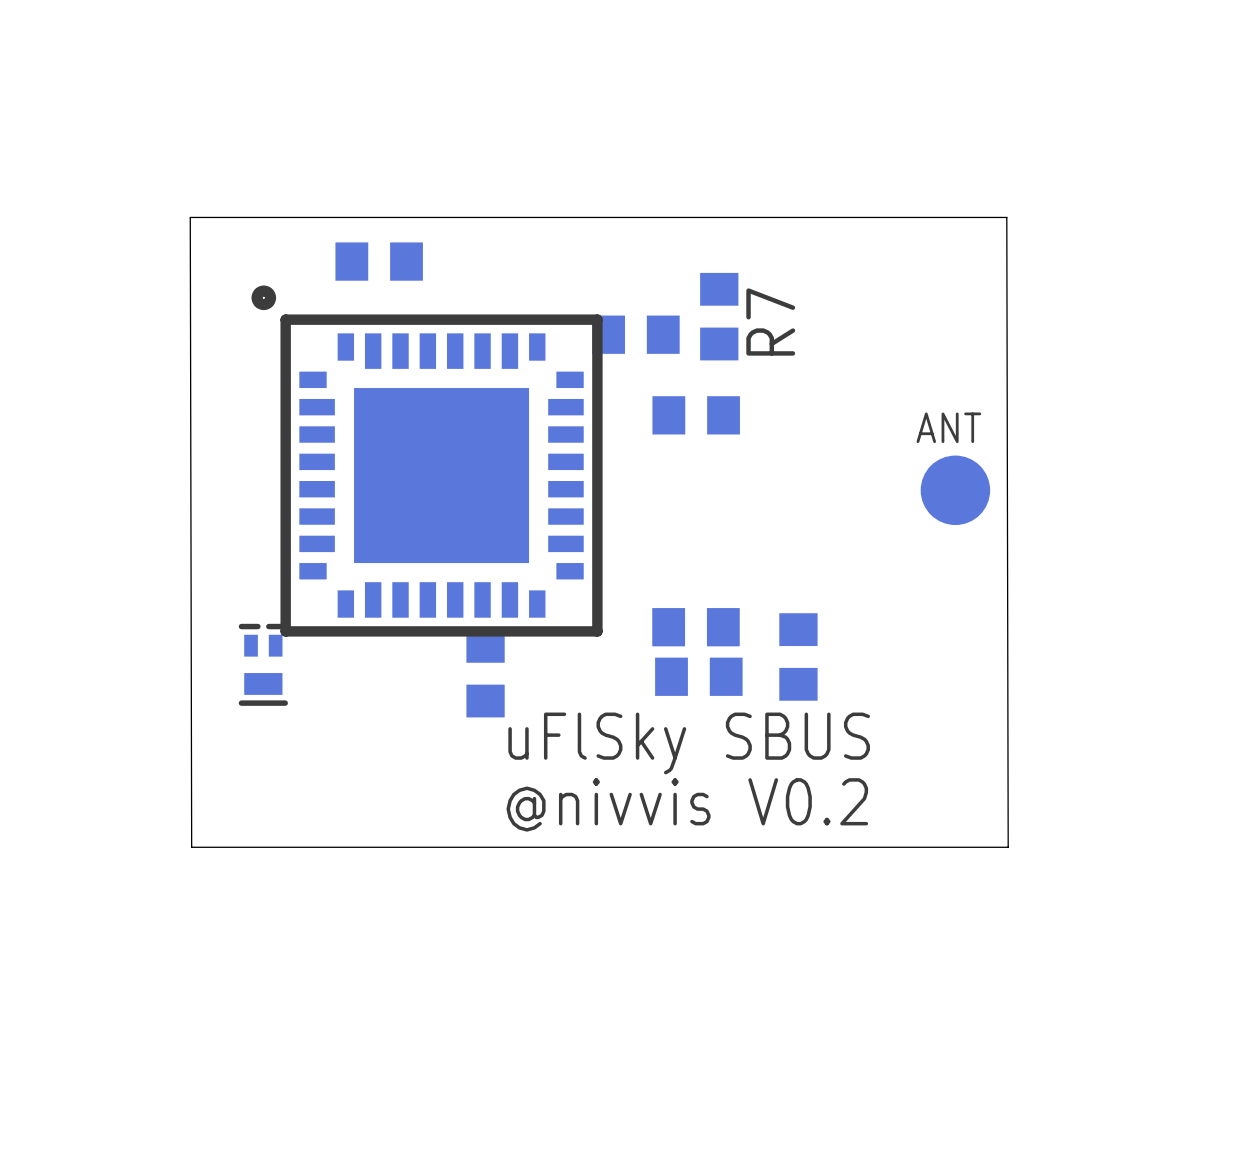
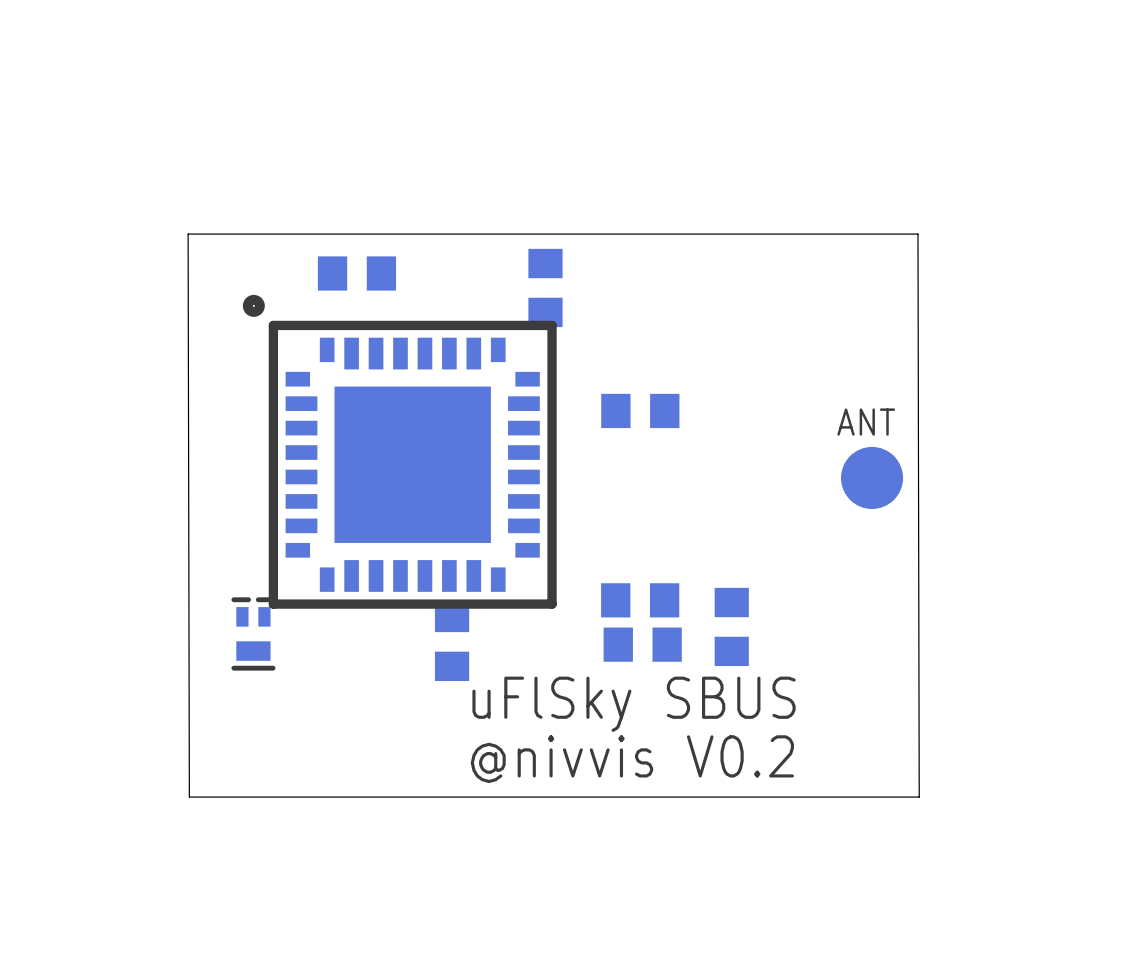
R7: (719, 316) -> none
part rotation: 0° (635, 334) -> 90° clockwise (545, 287)
part position: (635, 334) -> (545, 287)

